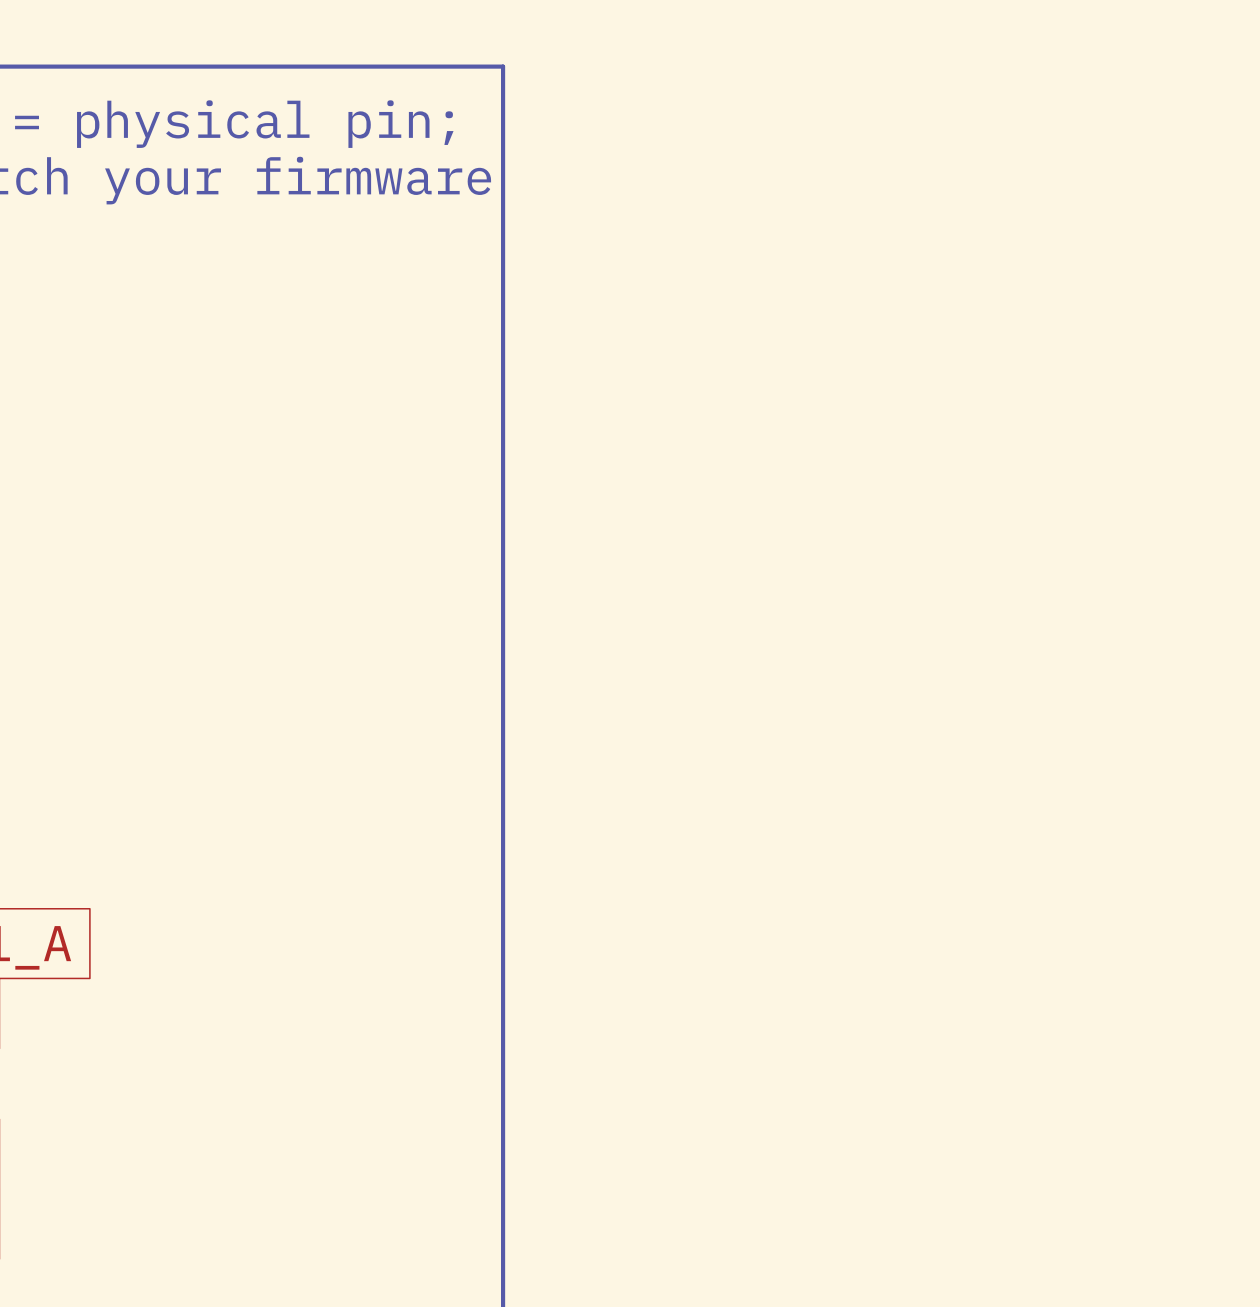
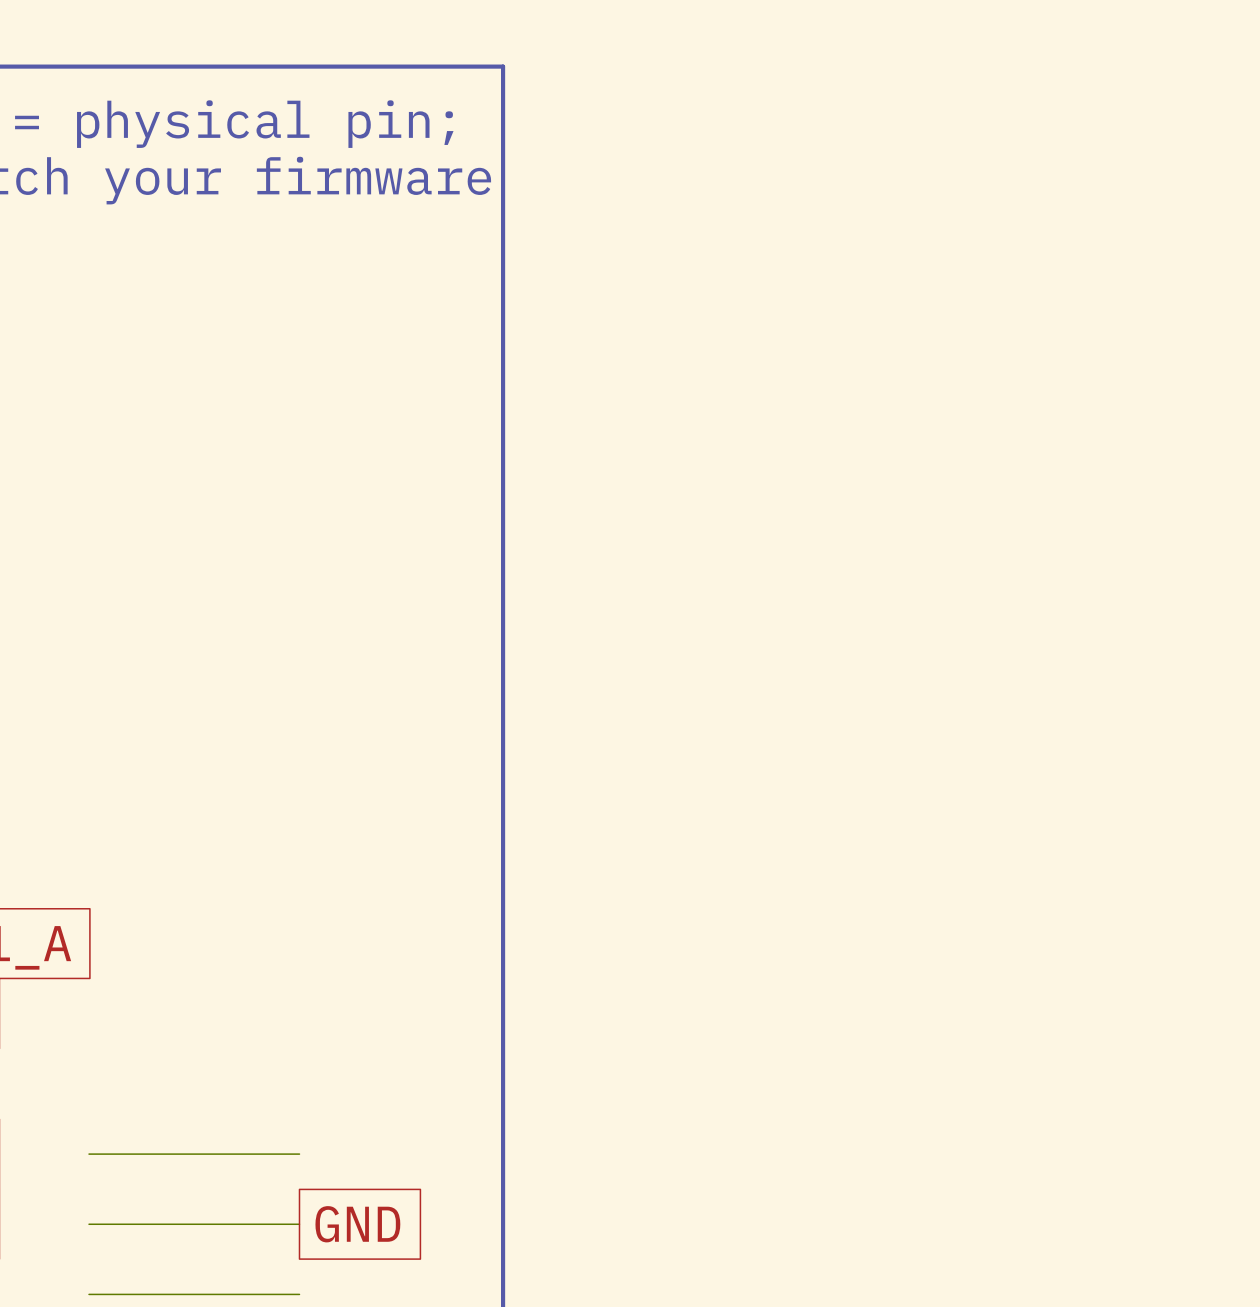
wire: none -> (89, 1154) (299, 1154)
wire: none -> (89, 1224) (299, 1224)
global label: none -> GND (357, 1224)
wire: none -> (89, 1294) (299, 1294)

